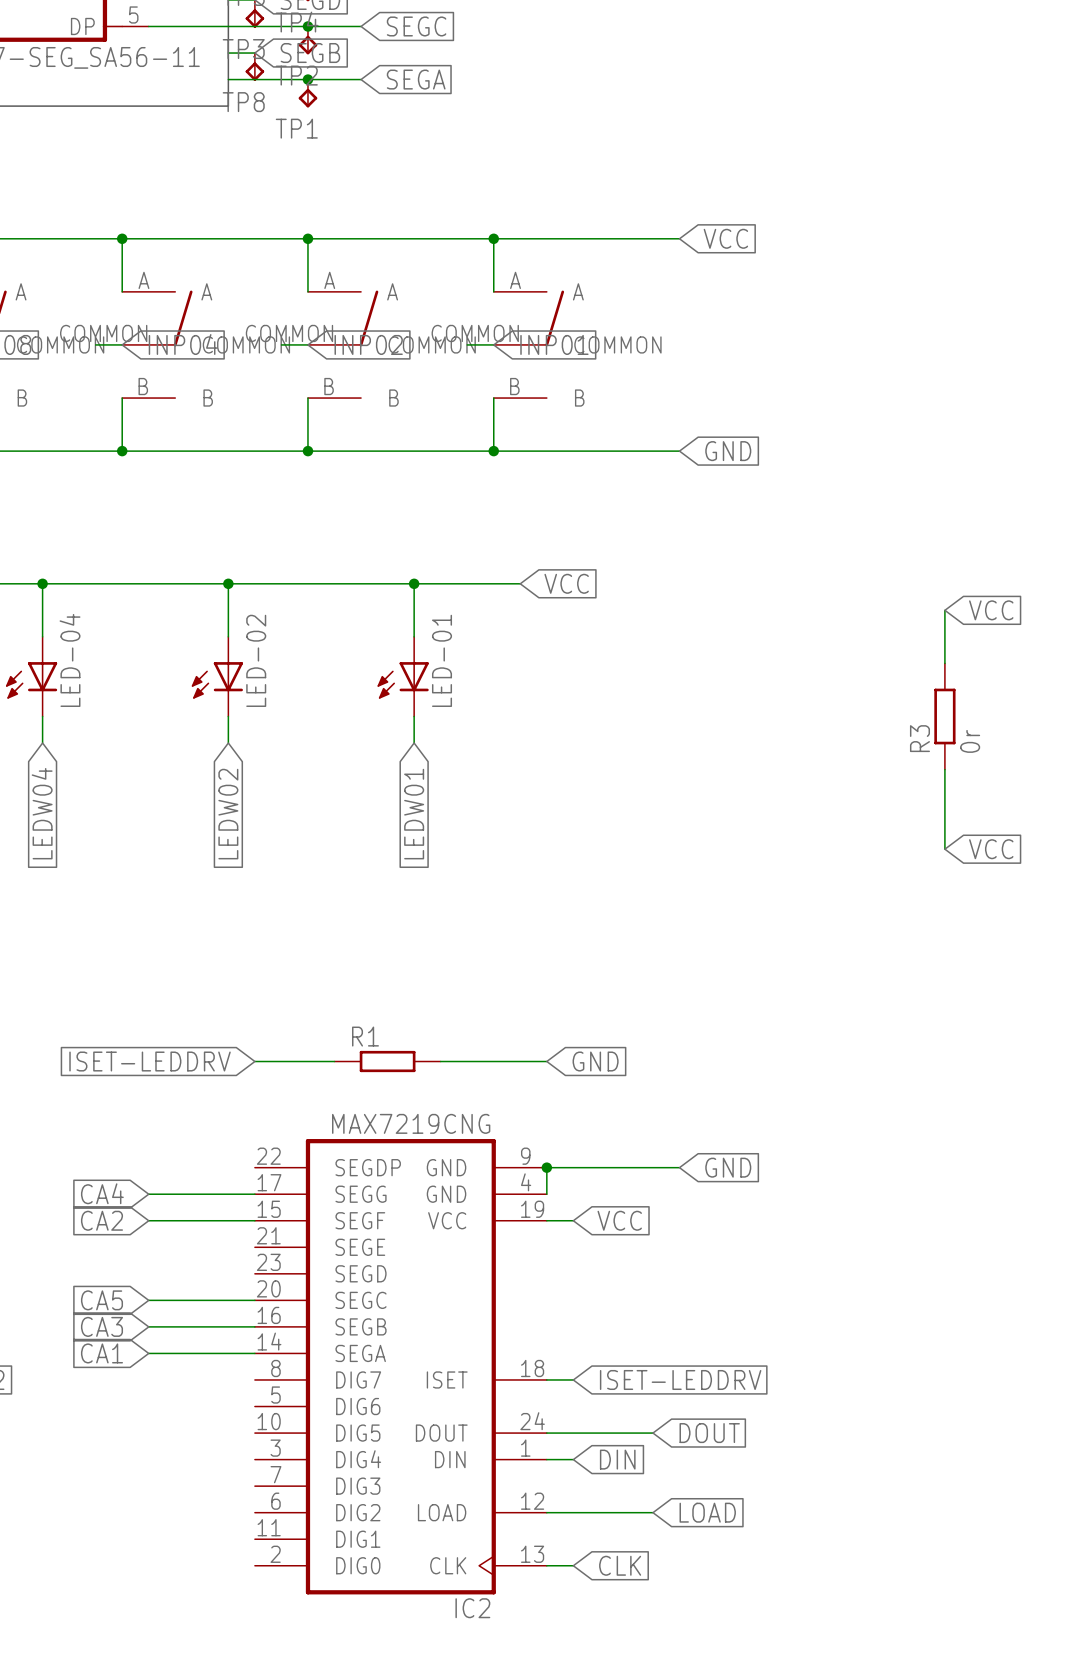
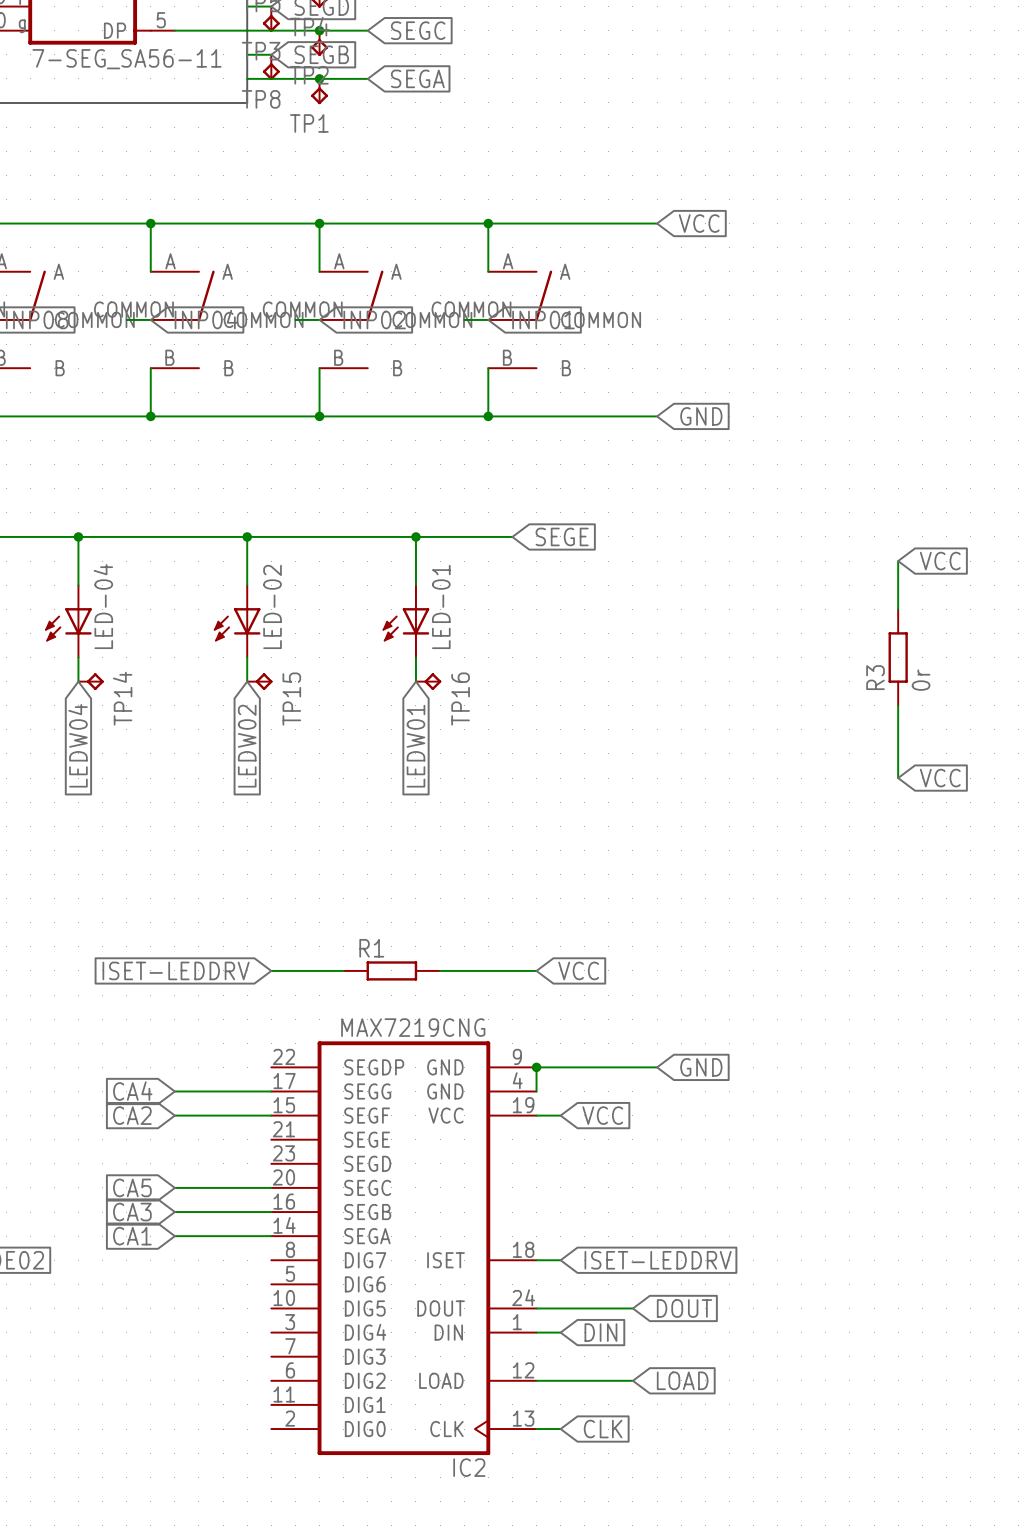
global label: VCC (566, 583) -> SEGE (562, 536)
TP14: none -> (91, 681)
TP15: none -> (259, 681)
TP16: none -> (428, 681)
global label: GND (595, 1061) -> VCC (578, 970)

